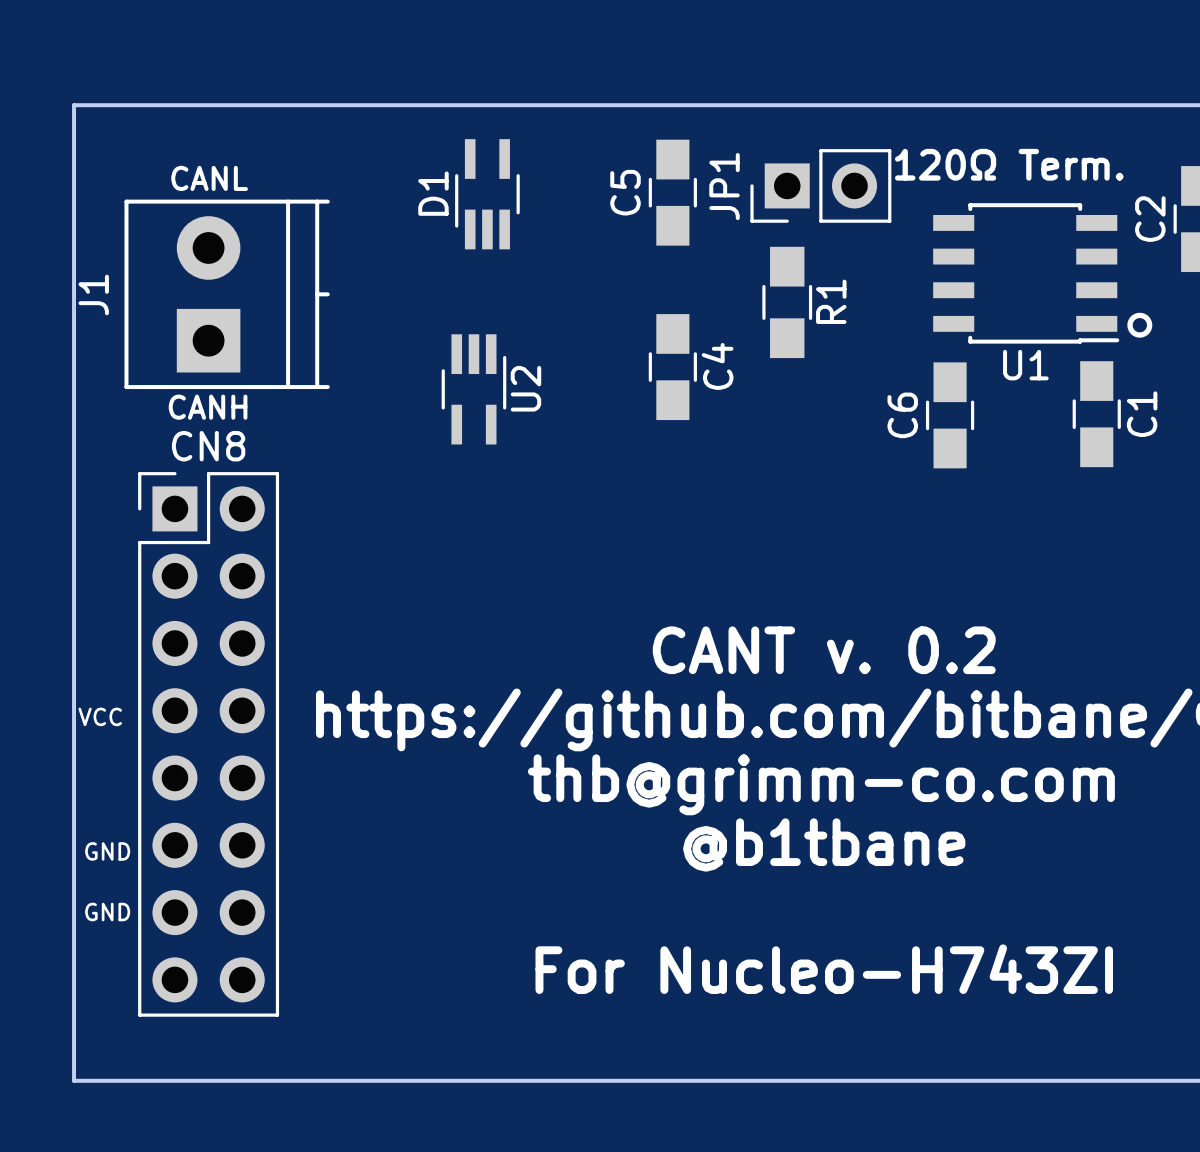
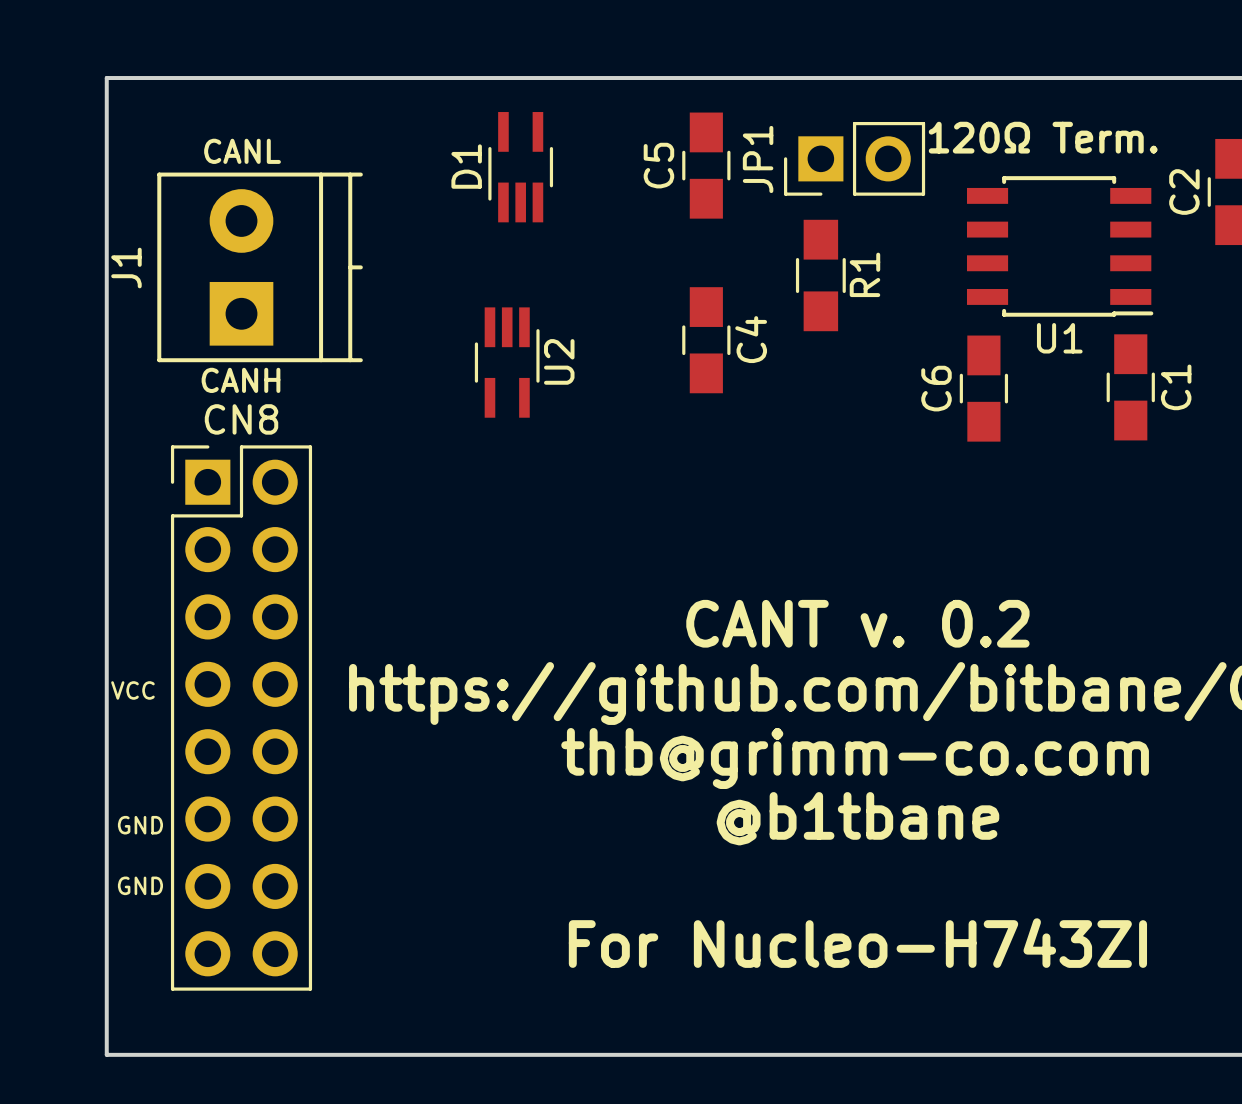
drawing: [1127, 312, 1153, 338] -> none

